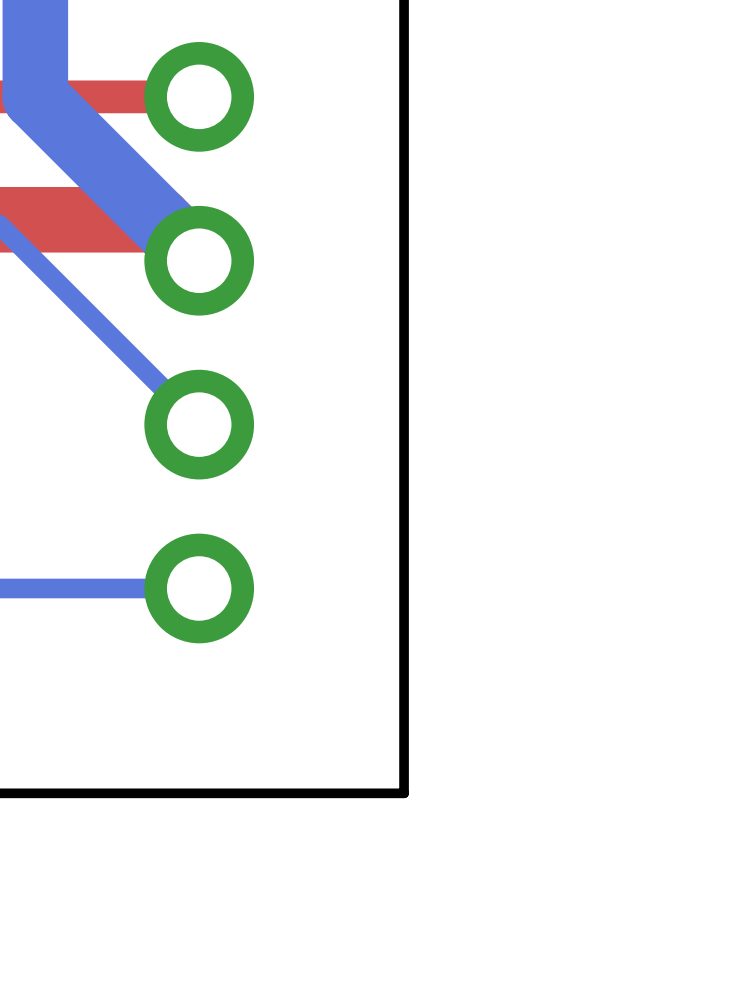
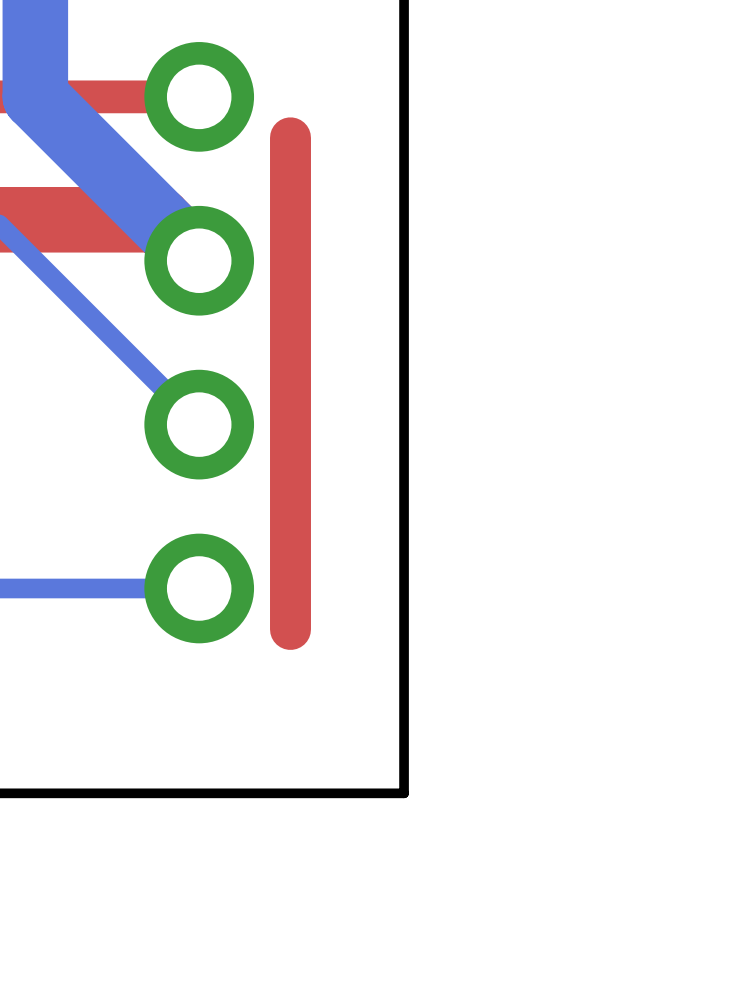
top track: none -> (290, 137) (290, 629)

